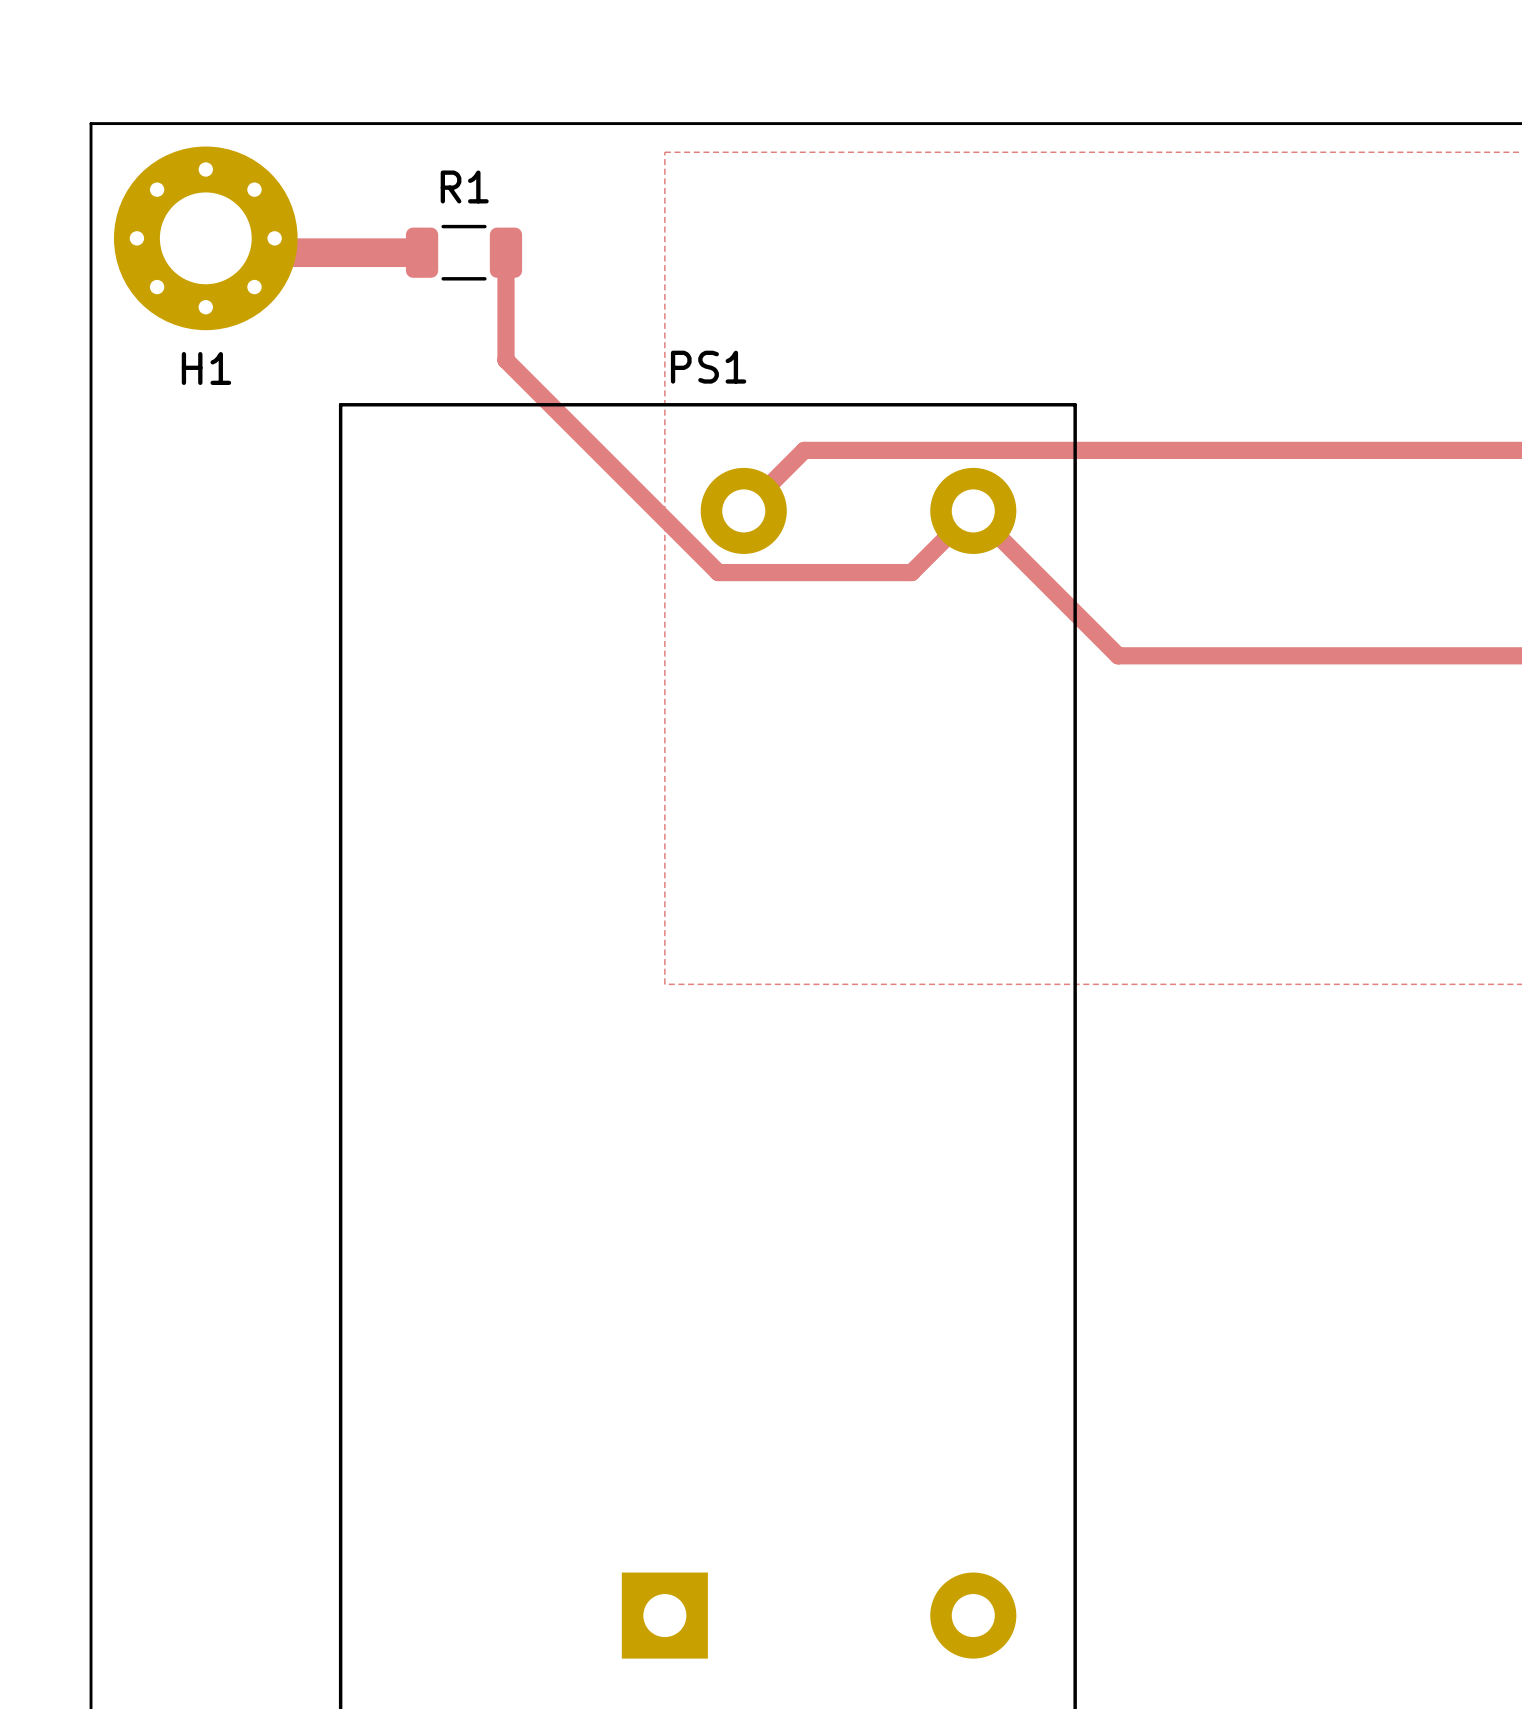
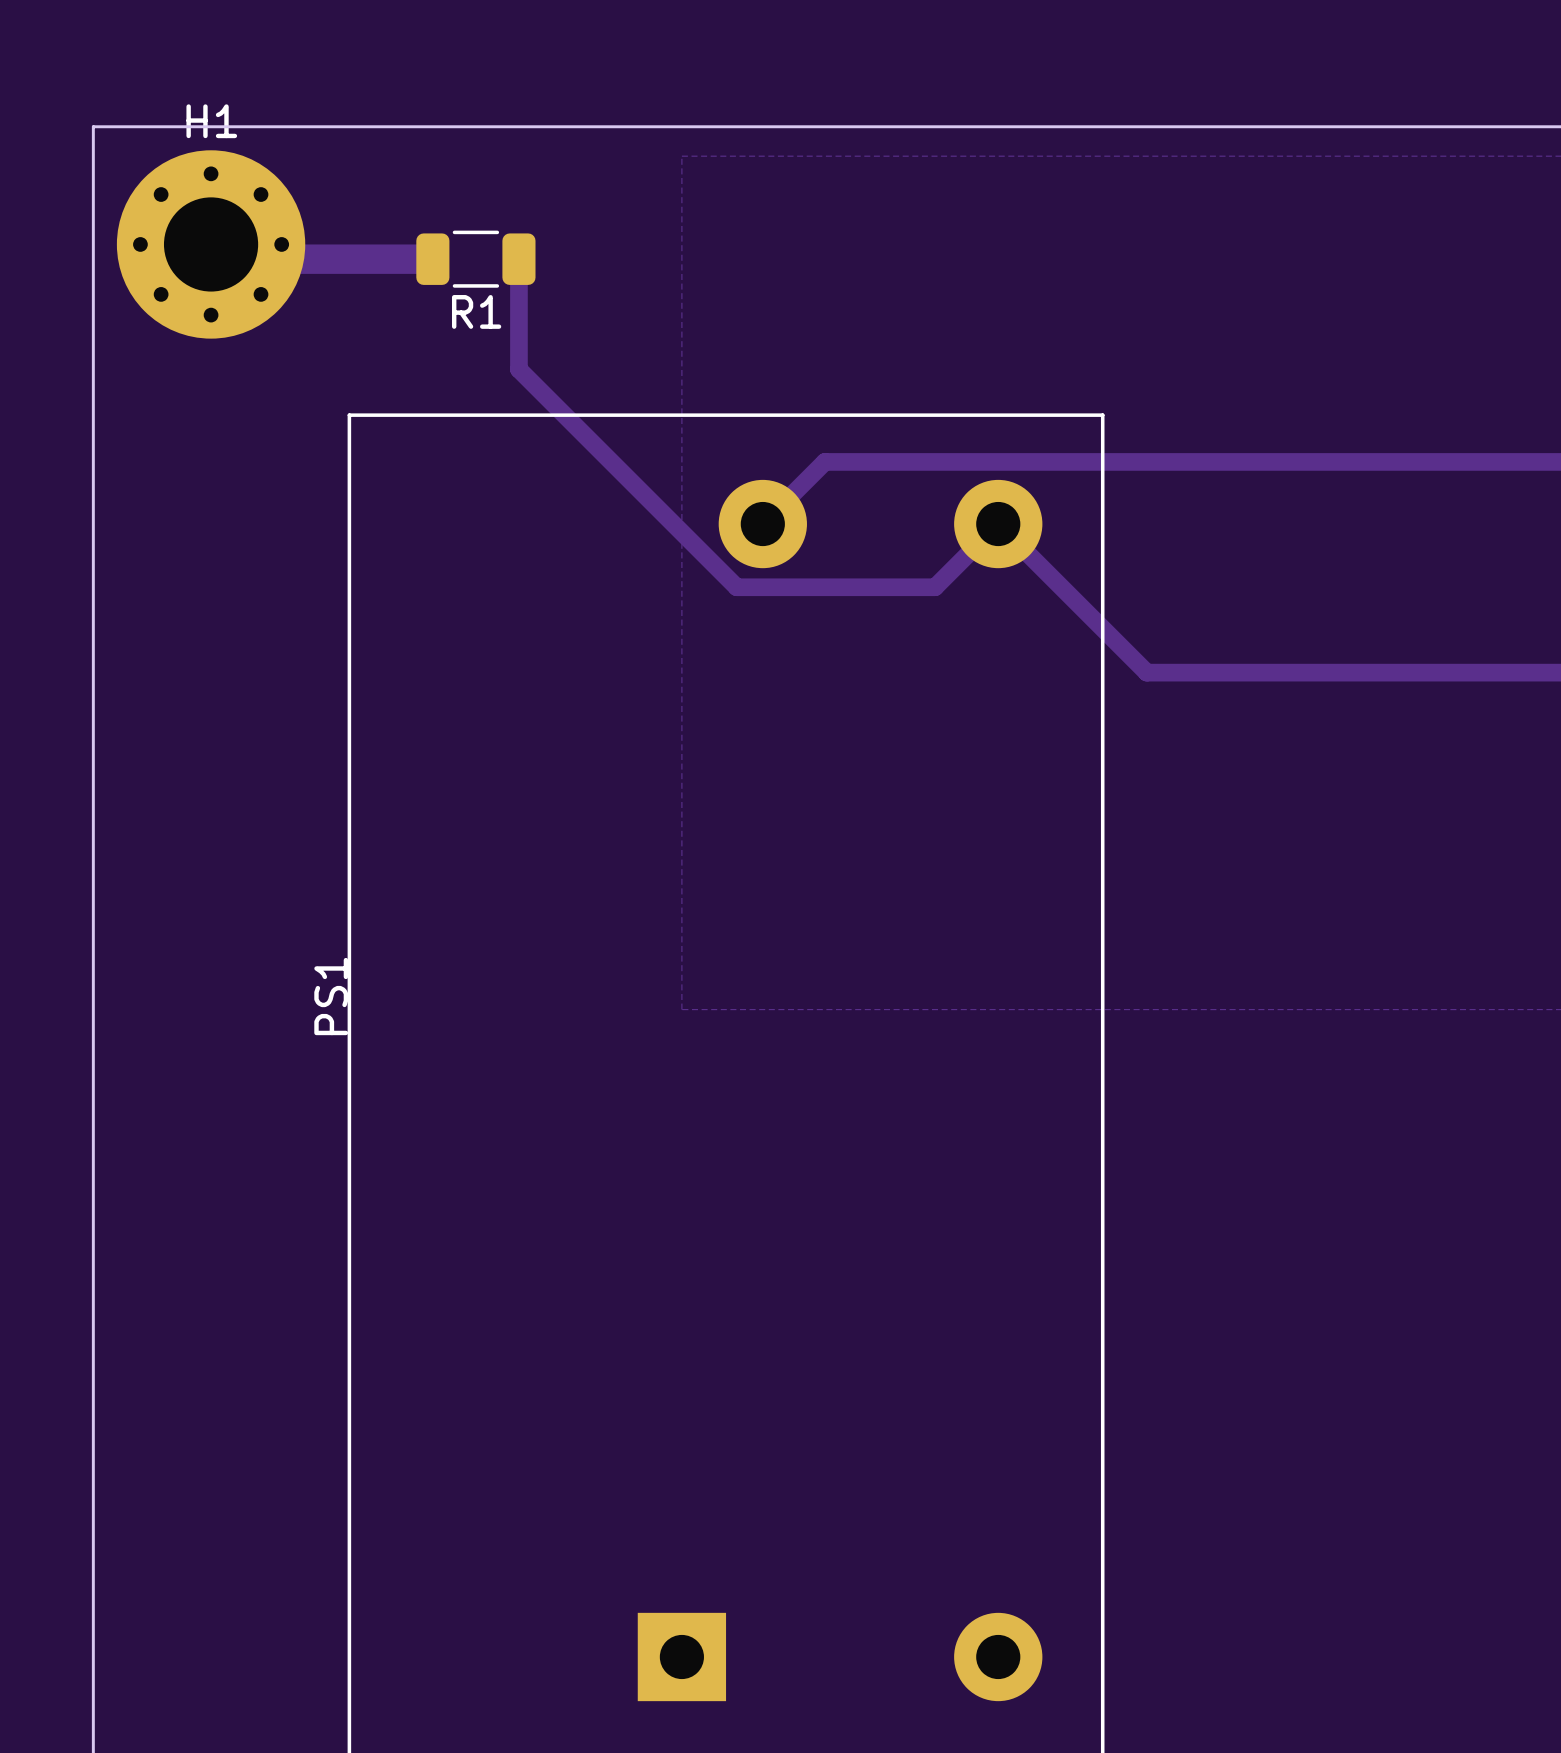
R1 name position: R1 (464, 186) -> R1 (476, 311)
PS1 name rotation: 0° (708, 367) -> 90° counterclockwise (331, 996)
PS1 name position: PS1 (708, 367) -> PS1 (331, 996)
H1 name position: H1 (206, 368) -> H1 (211, 121)

